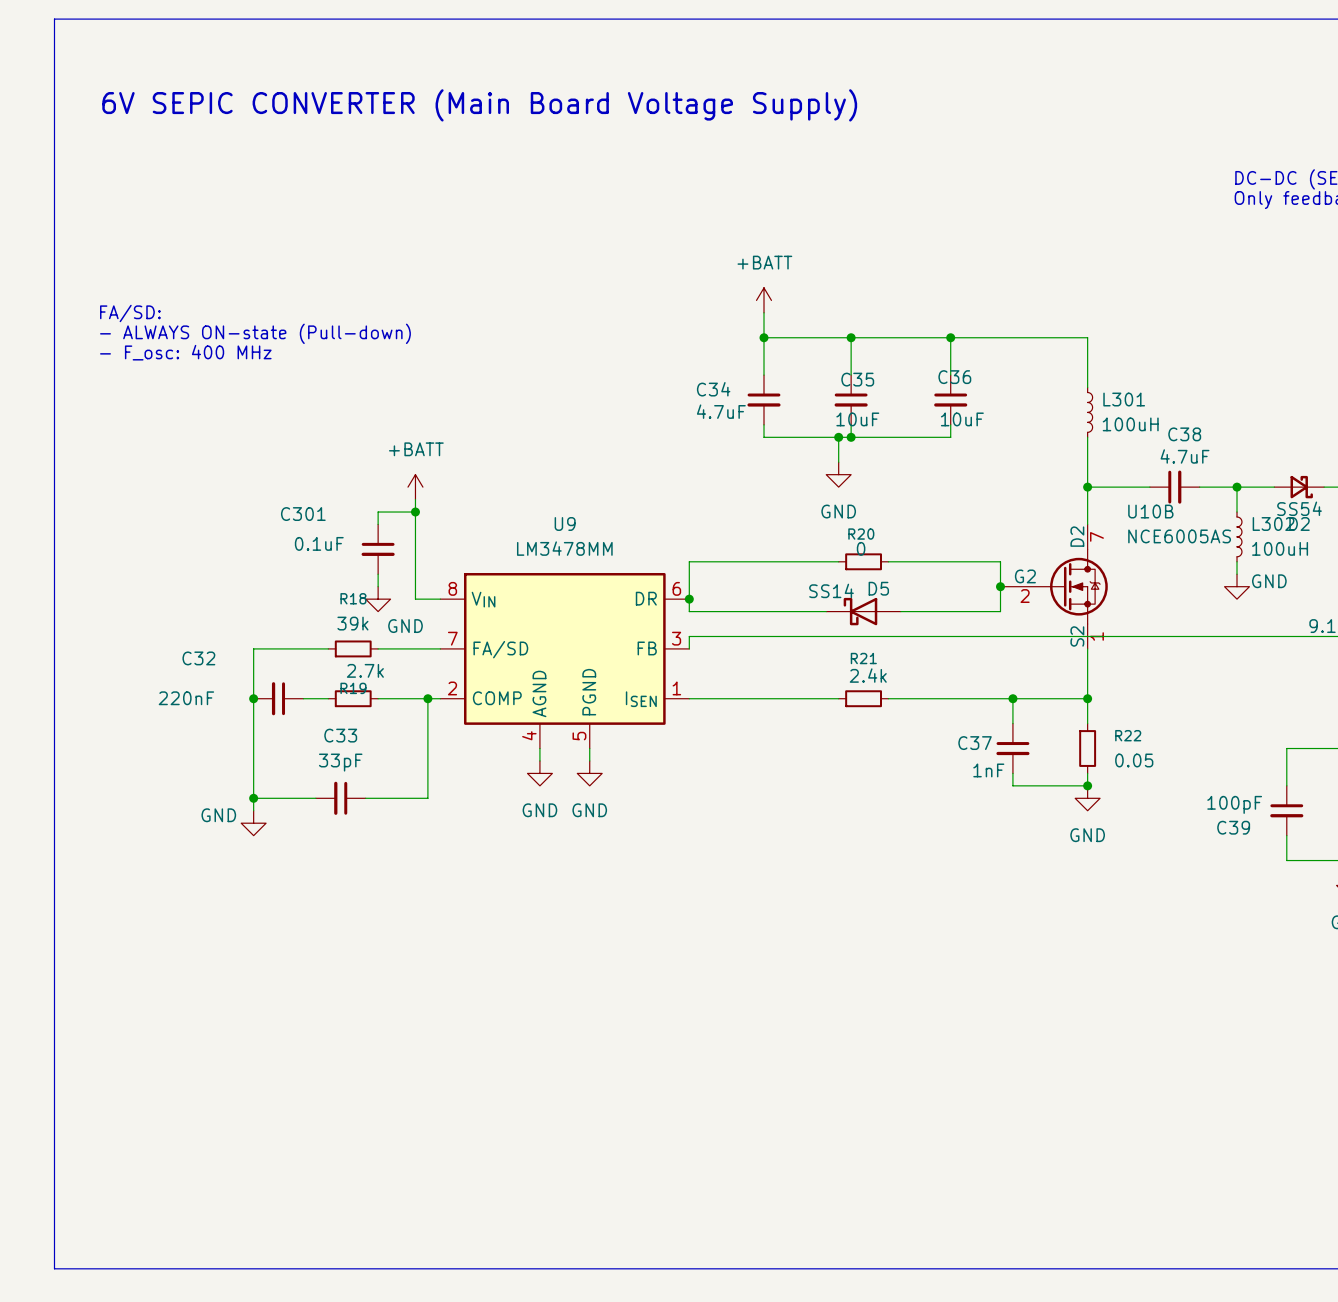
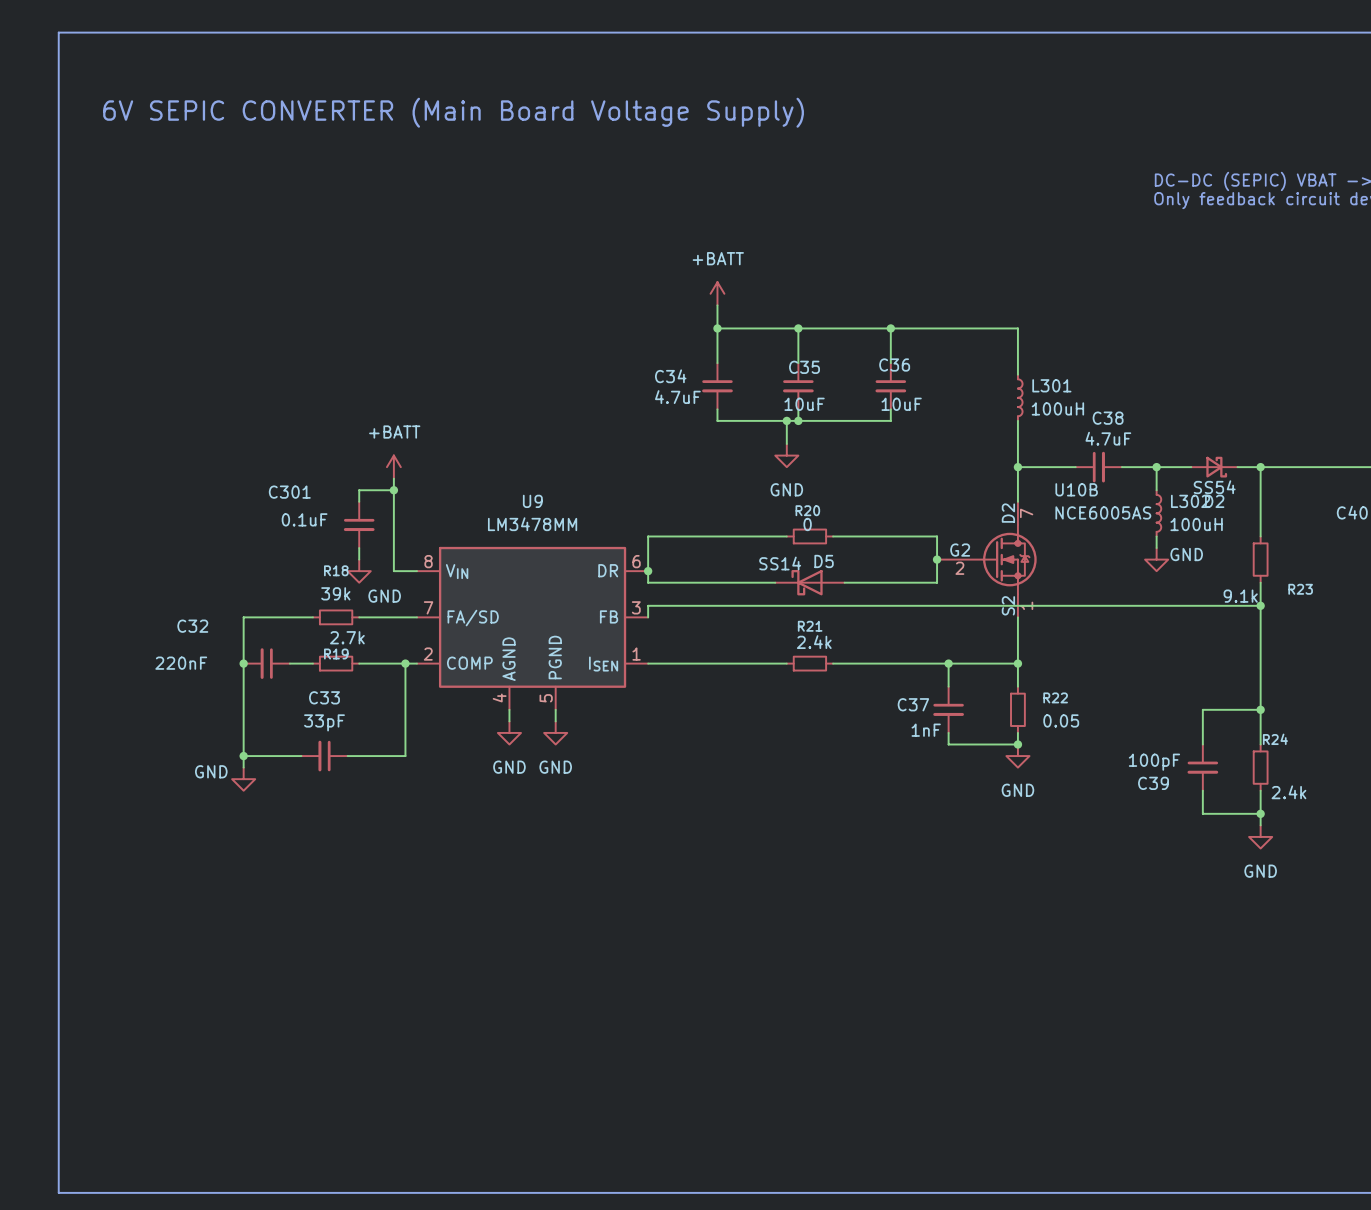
text: FA/SD: (130, 313) -> none
text: - ALWAYS ON-state (Pull-down) (255, 333) -> none
text: - F_osc: 400 MHz (185, 352) -> none

